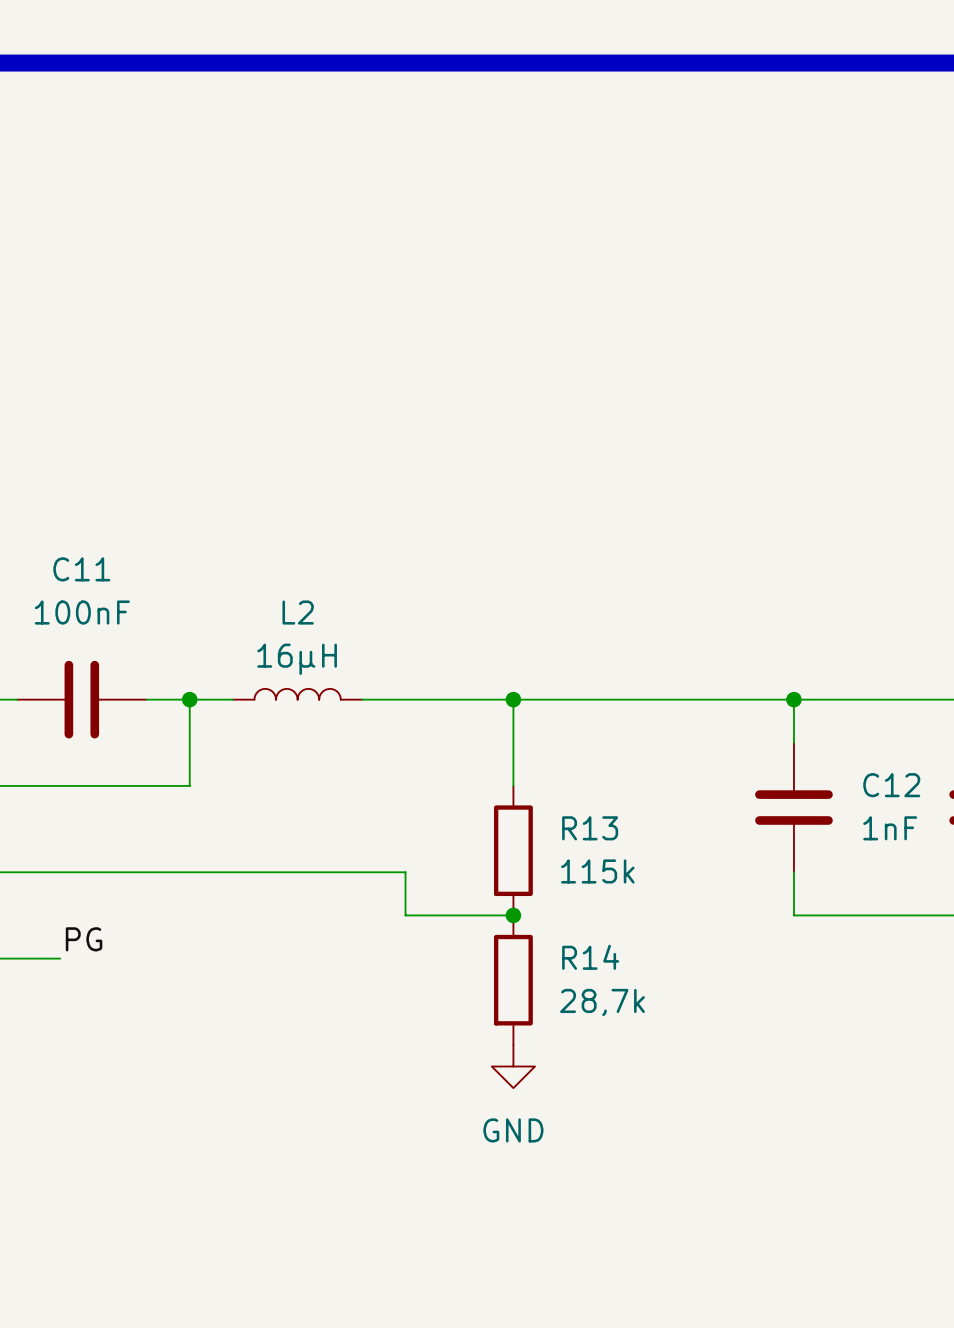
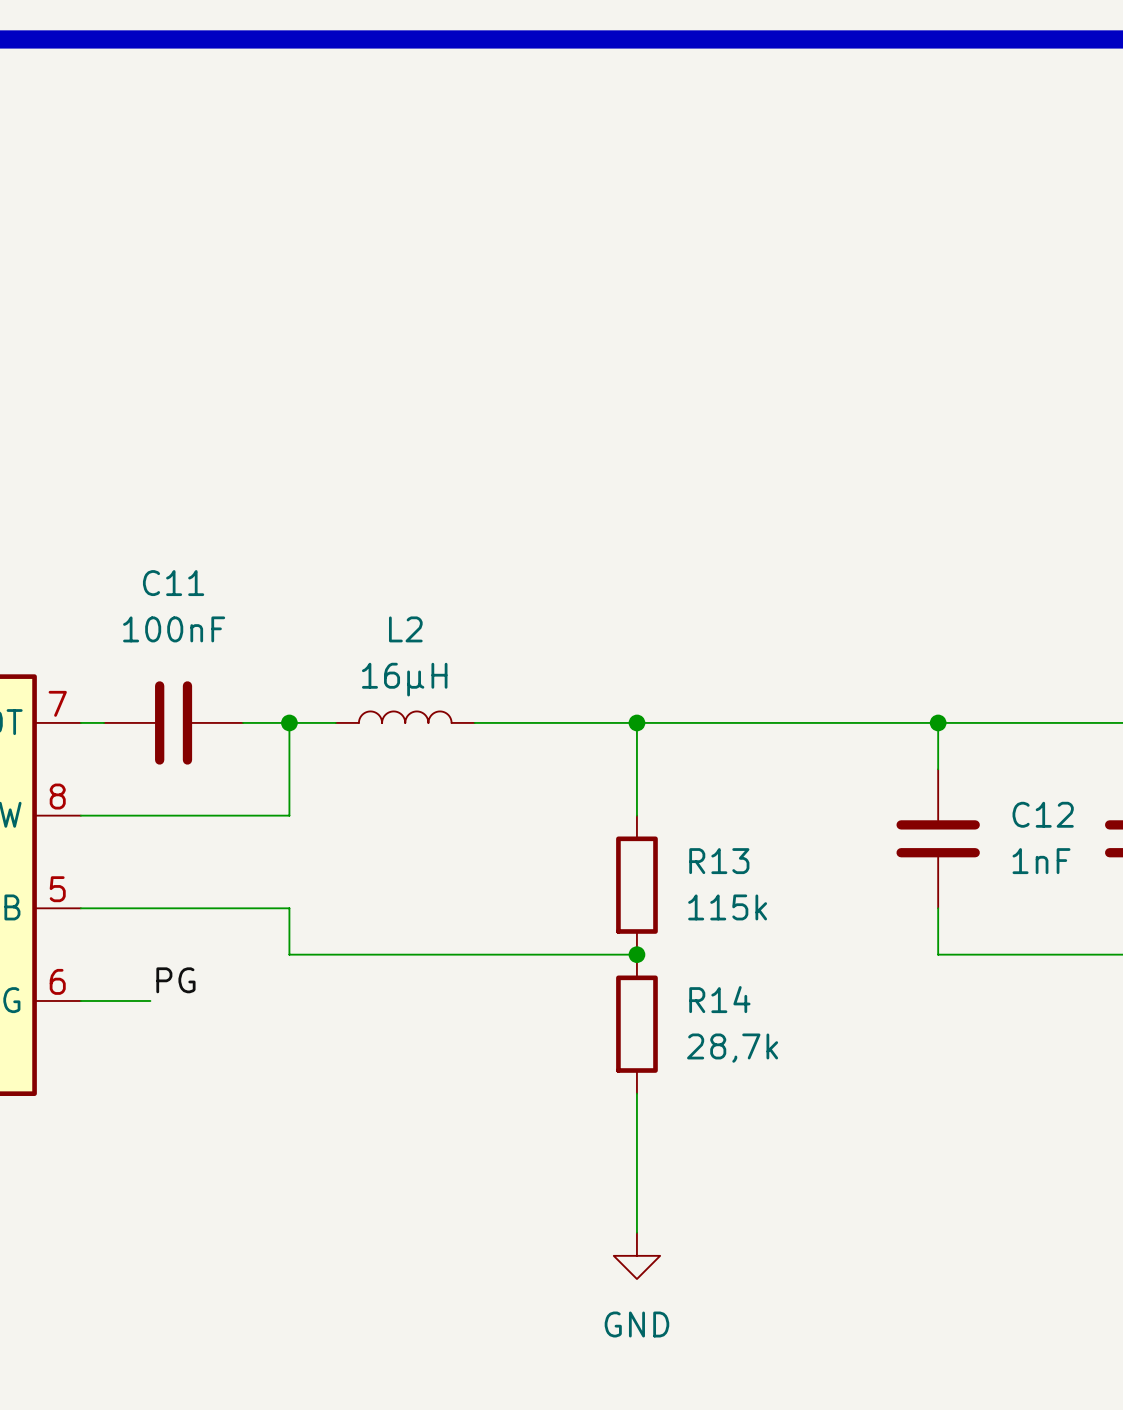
wire: (189, 872) (405, 872) (405, 915) -> (289, 908) (289, 954) (521, 954)
wire: none -> (636, 1093) (636, 1232)
power symbol position: GND (513, 1066) -> GND (636, 1255)

